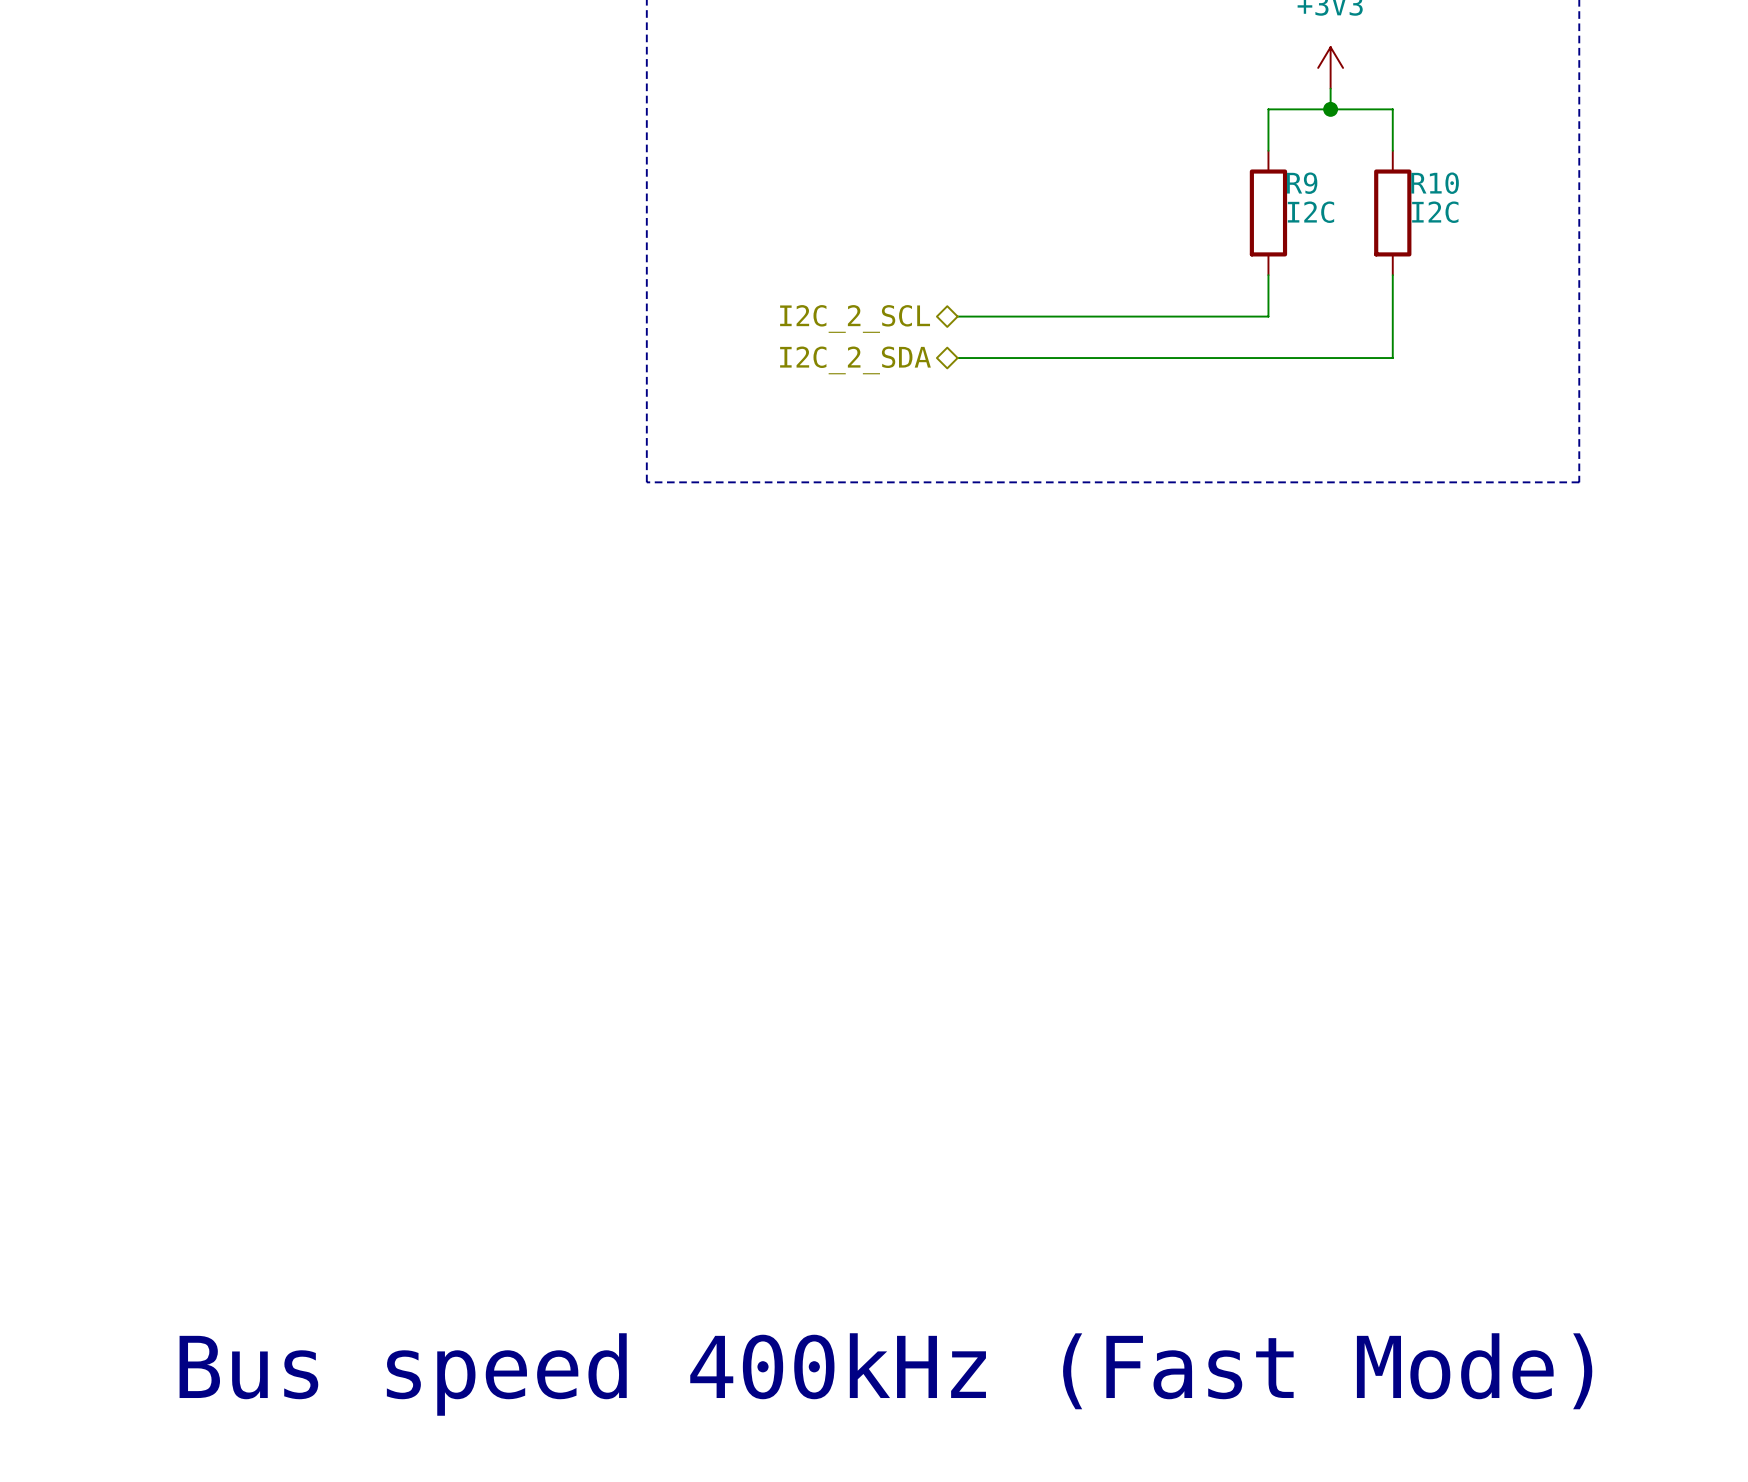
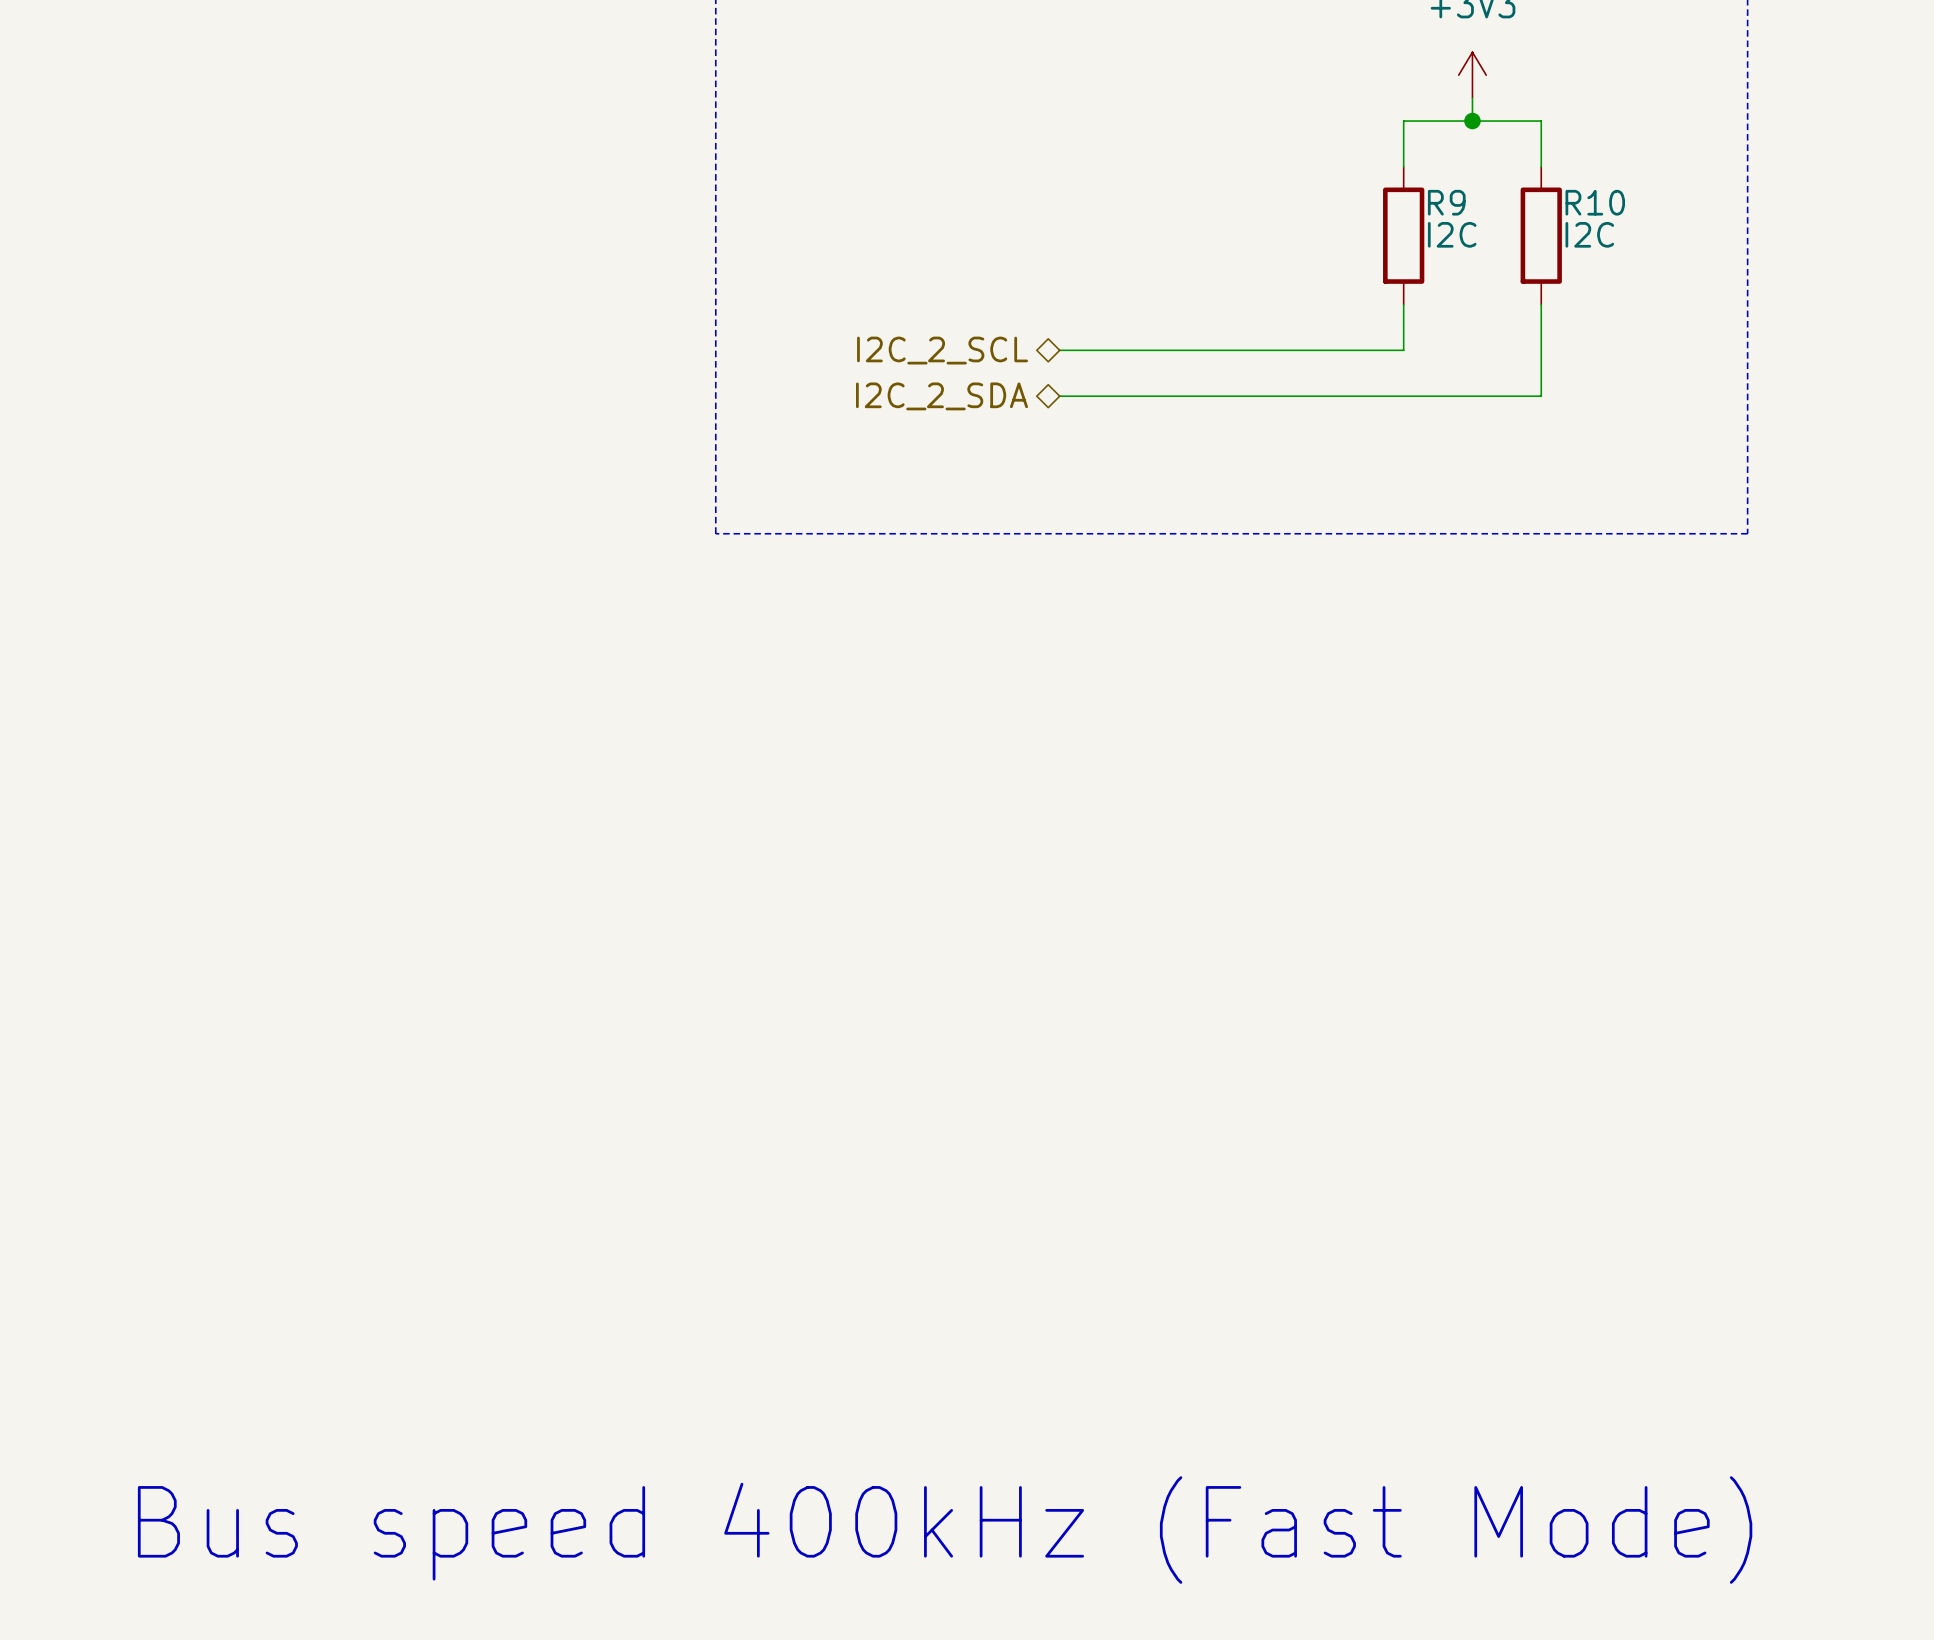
text position: Bus speed 400kHz (Fast Mode) (885, 1374) -> Bus speed 400kHz (Fast Mode) (945, 1530)

